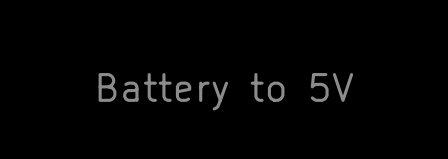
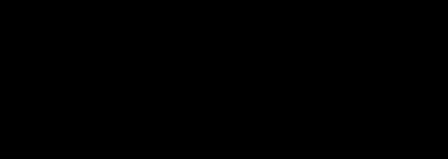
text: Battery to 5V (225, 91) -> none

